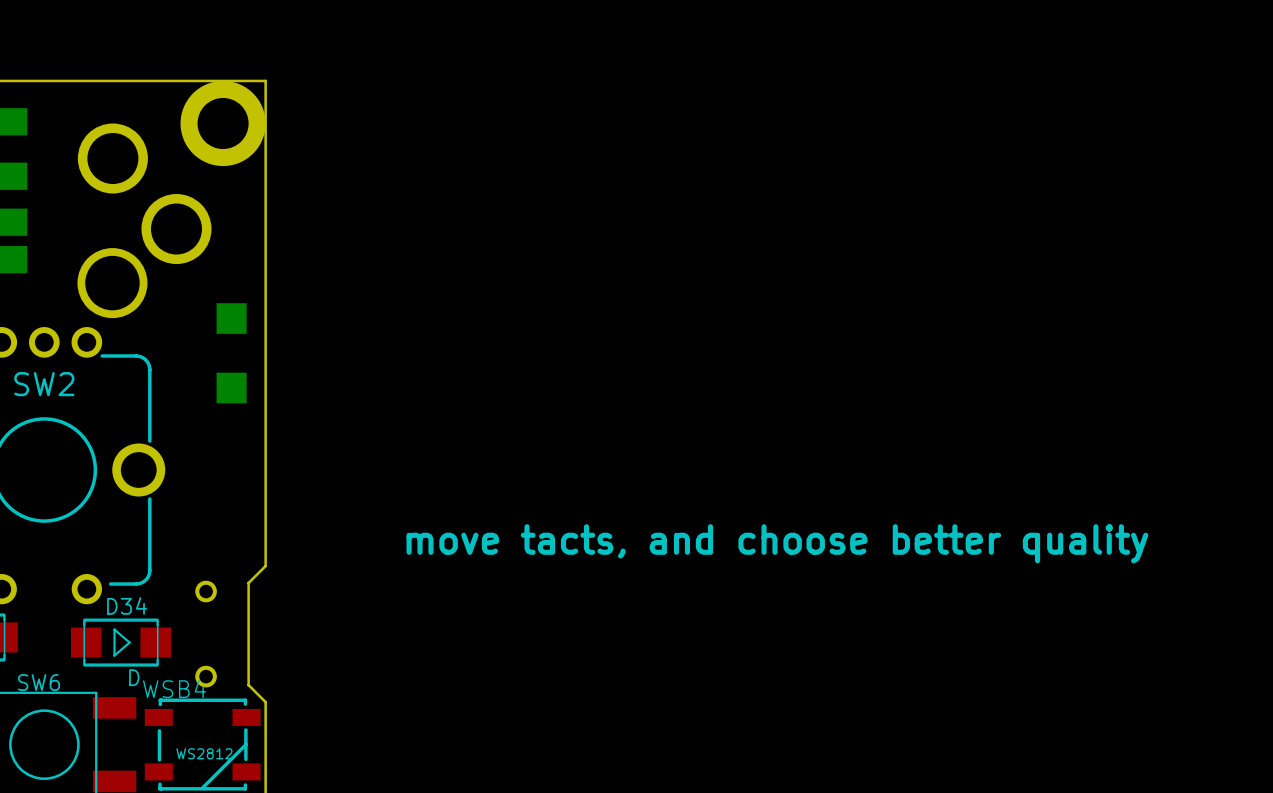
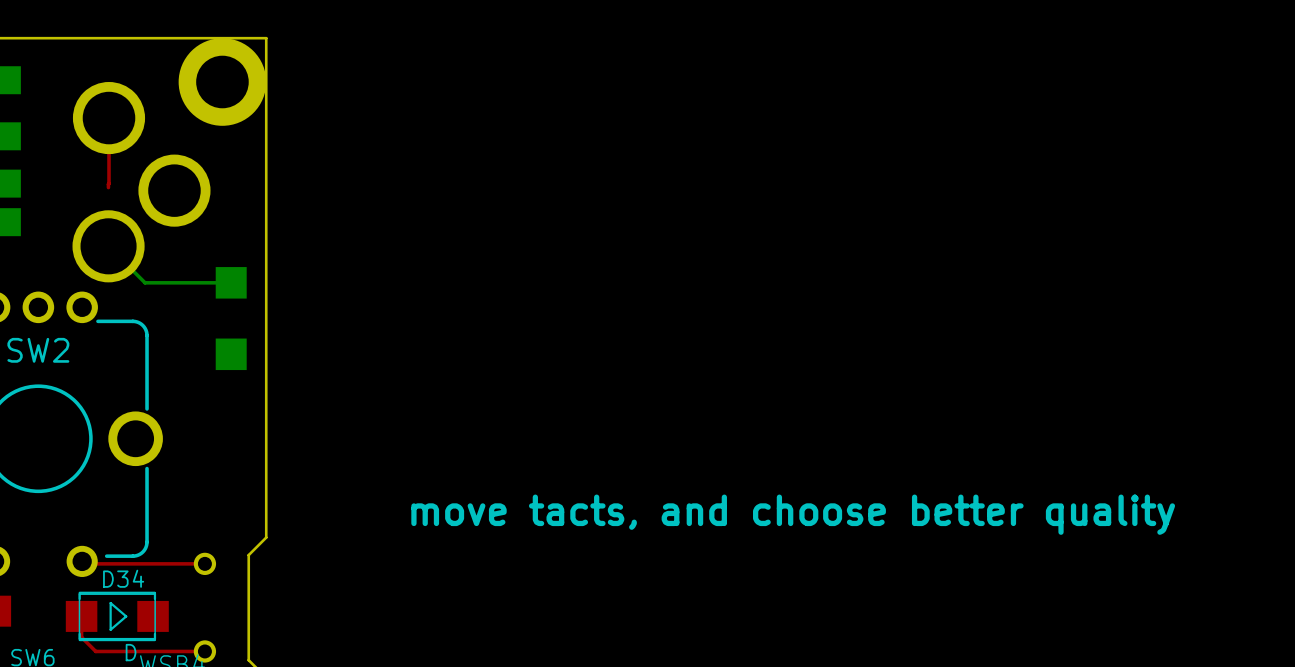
top track: none -> (108, 118) (108, 187)
bottom track: none -> (108, 246) (145, 282) (231, 282)
top track: none -> (82, 561) (82, 563) (204, 563)
top track: none -> (81, 616) (81, 637) (95, 651) (204, 651)

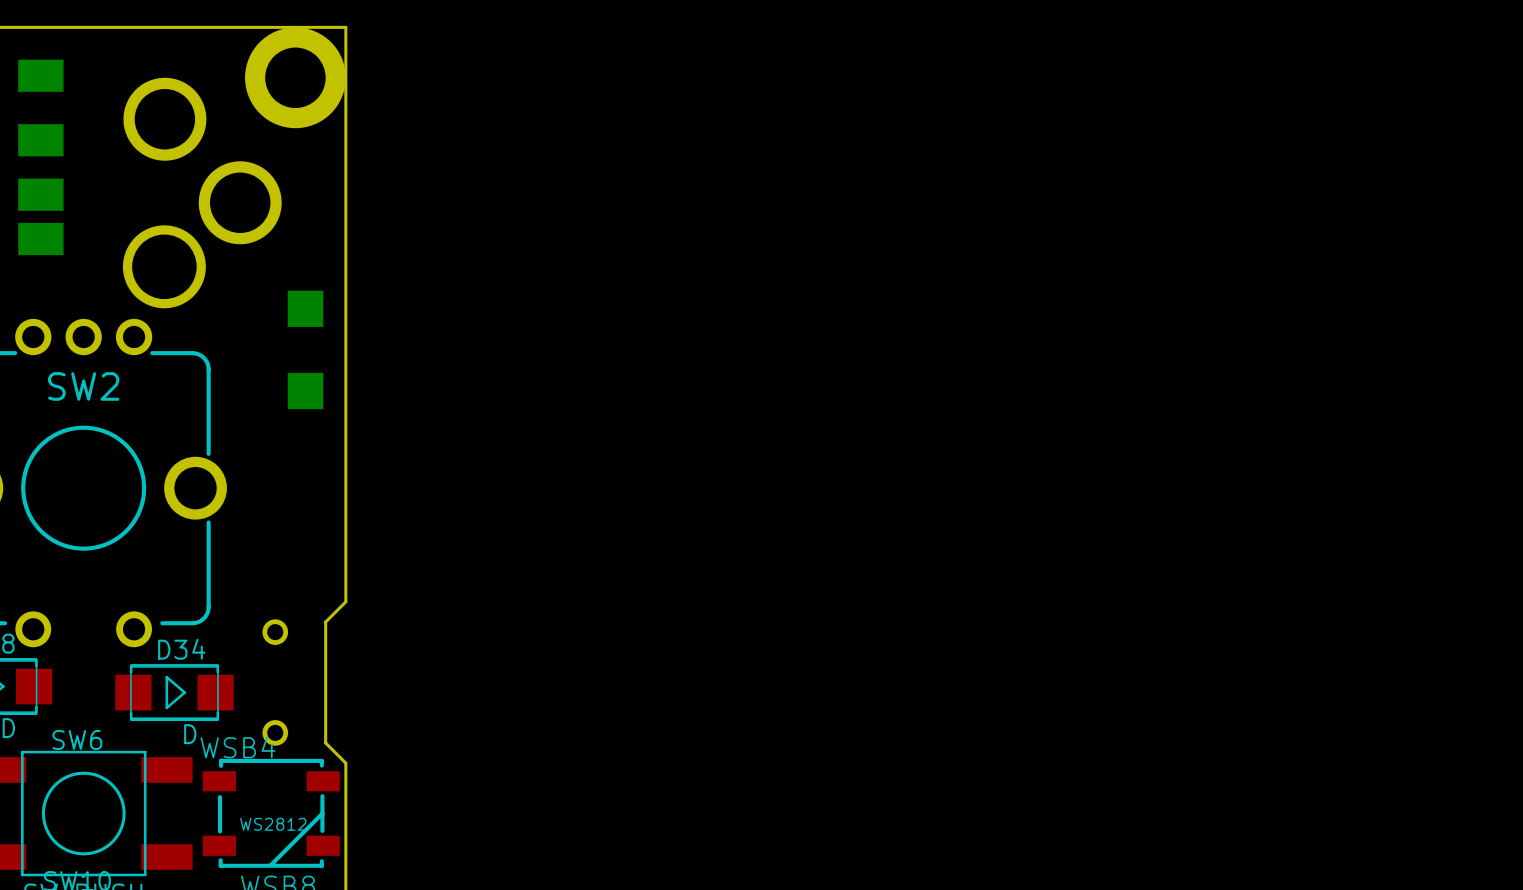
top track: (108, 118) (108, 187) -> none
bottom track: (108, 246) (145, 282) (231, 282) -> none
text: move tacts, and choose better quality (793, 514) -> none
top track: (82, 561) (82, 563) (204, 563) -> none
top track: (81, 616) (81, 637) (95, 651) (204, 651) -> none

